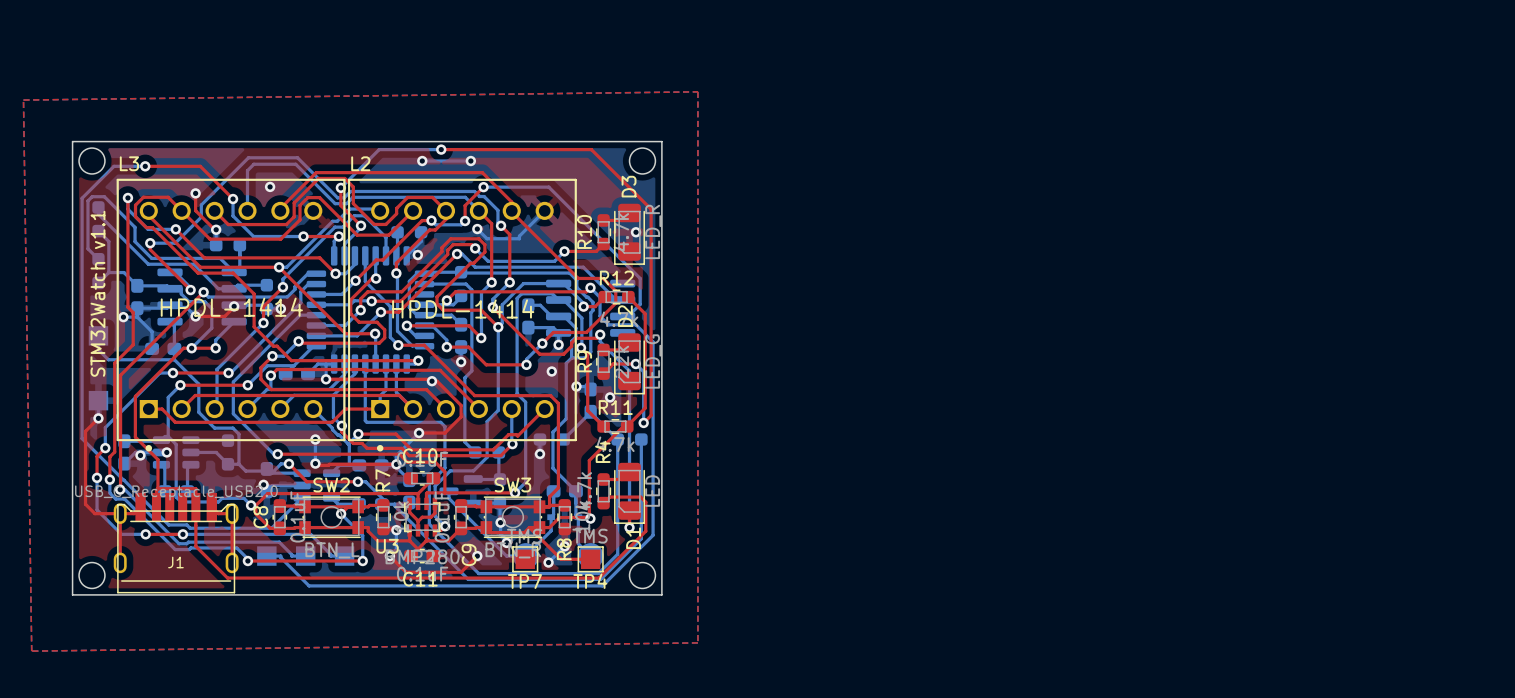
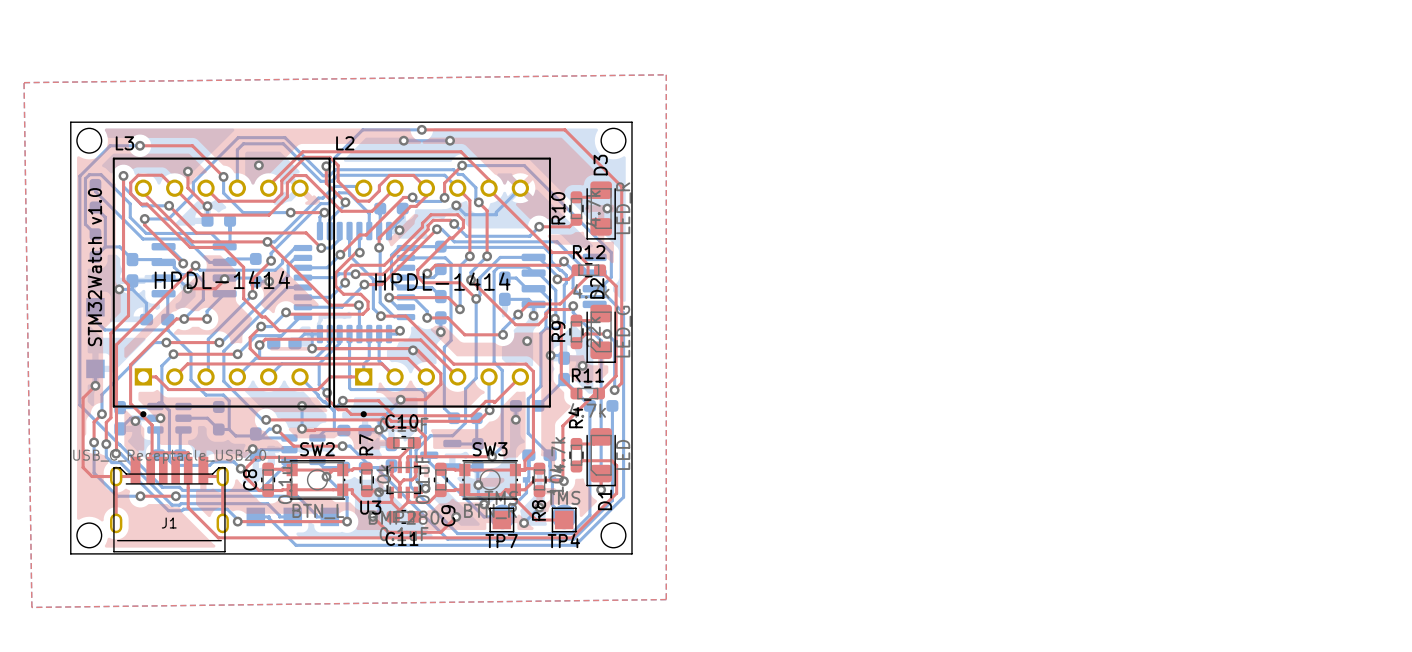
text: STM32Watch v1.1 (97, 293) -> STM32Watch v1.0 (94, 267)

